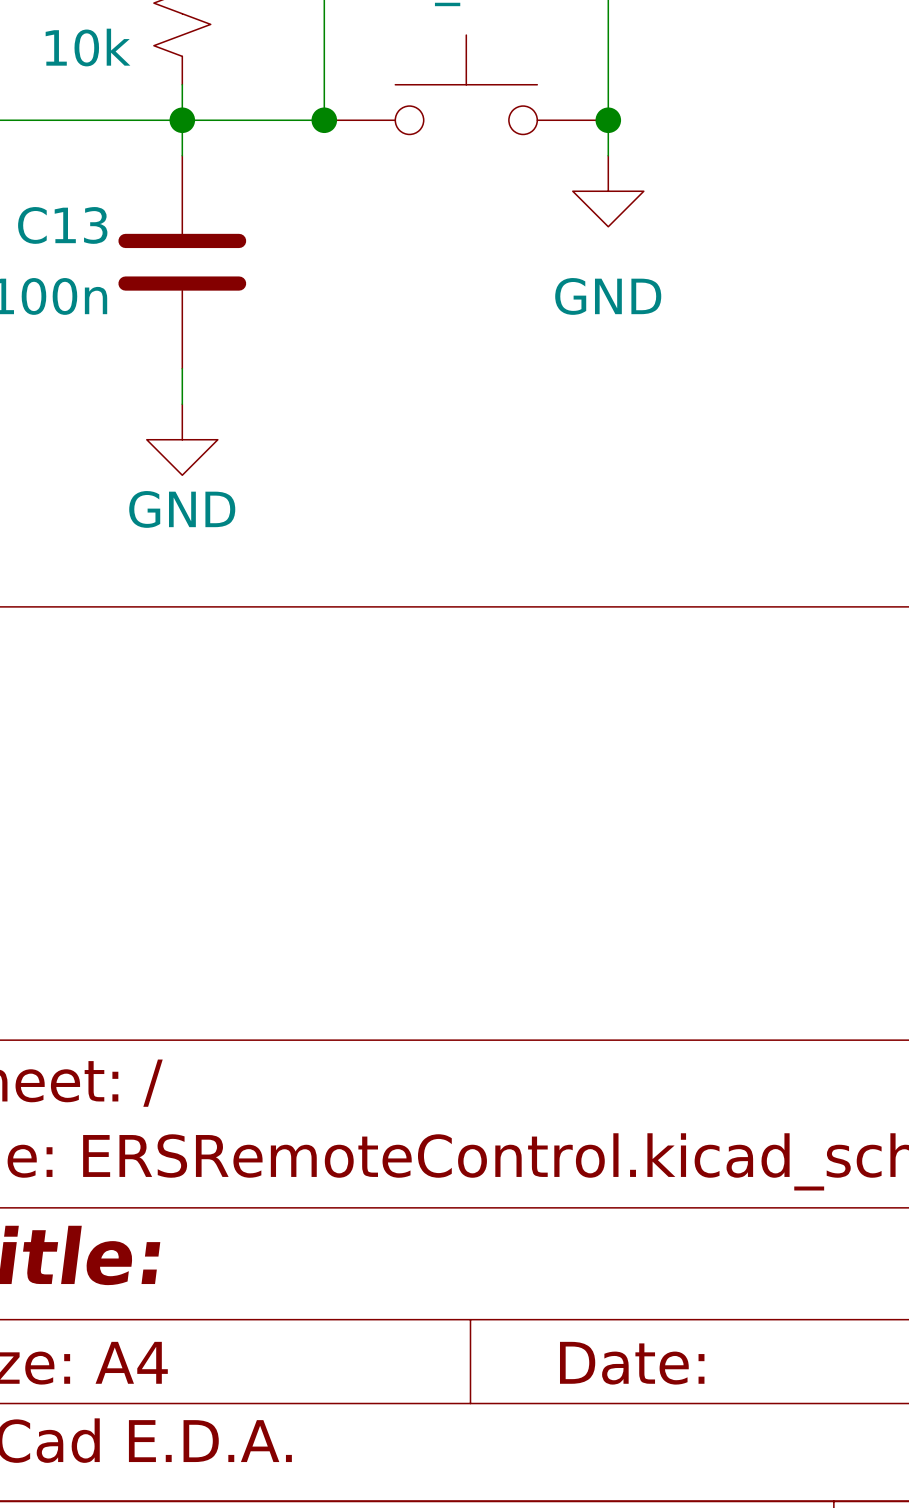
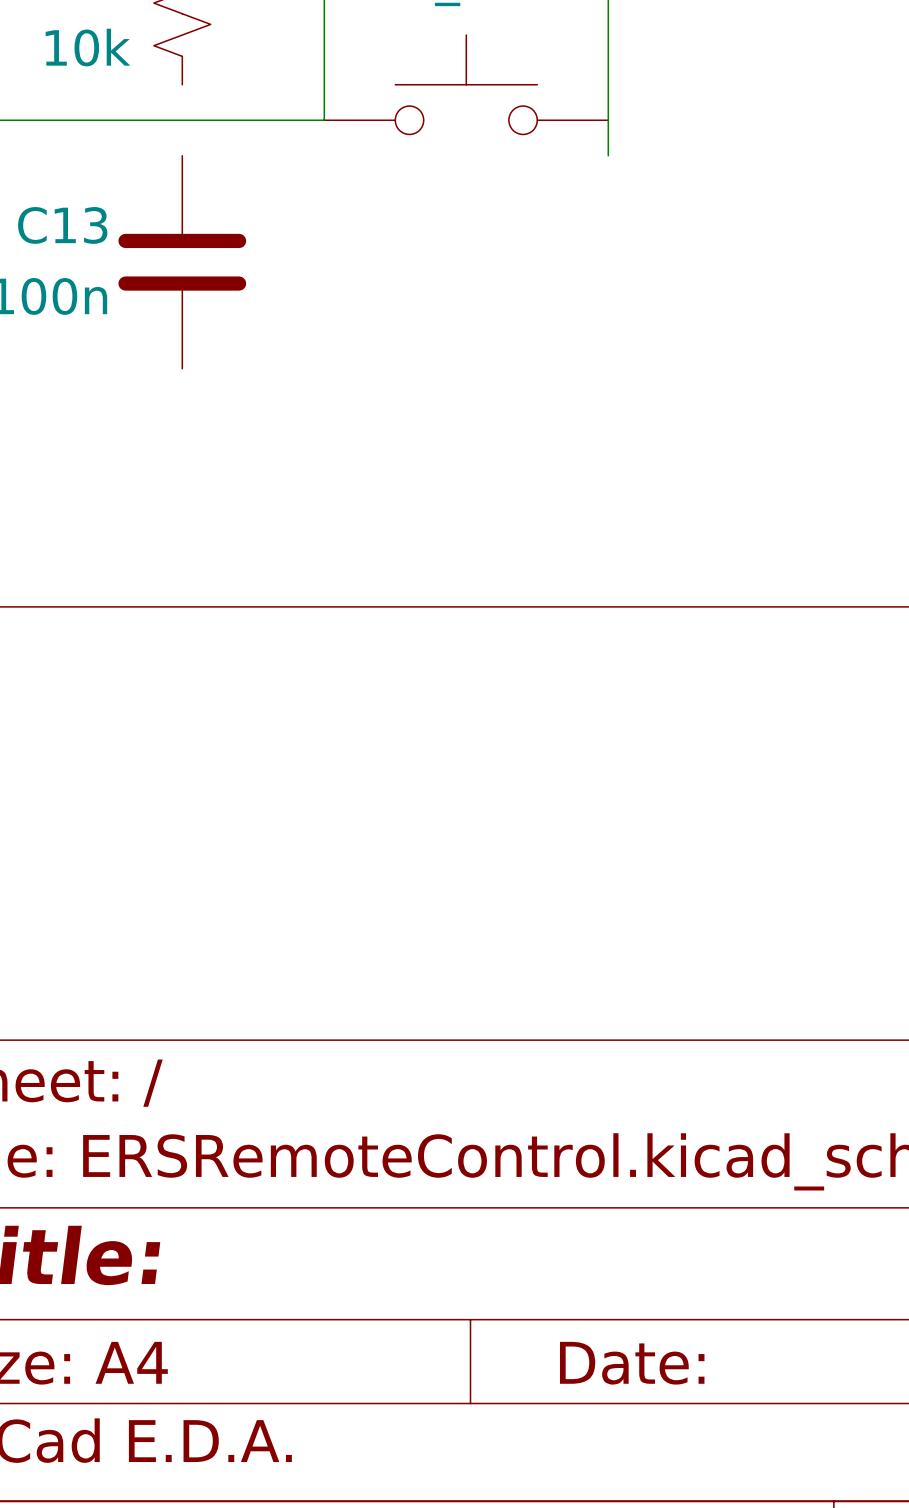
wire: (182, 84) (182, 155) -> none
junction: (182, 120) -> none
junction: (324, 120) -> none
junction: (608, 120) -> none
power symbol: GND (608, 191) -> none
wire: (182, 368) (182, 404) -> none
power symbol: GND (182, 439) -> none

